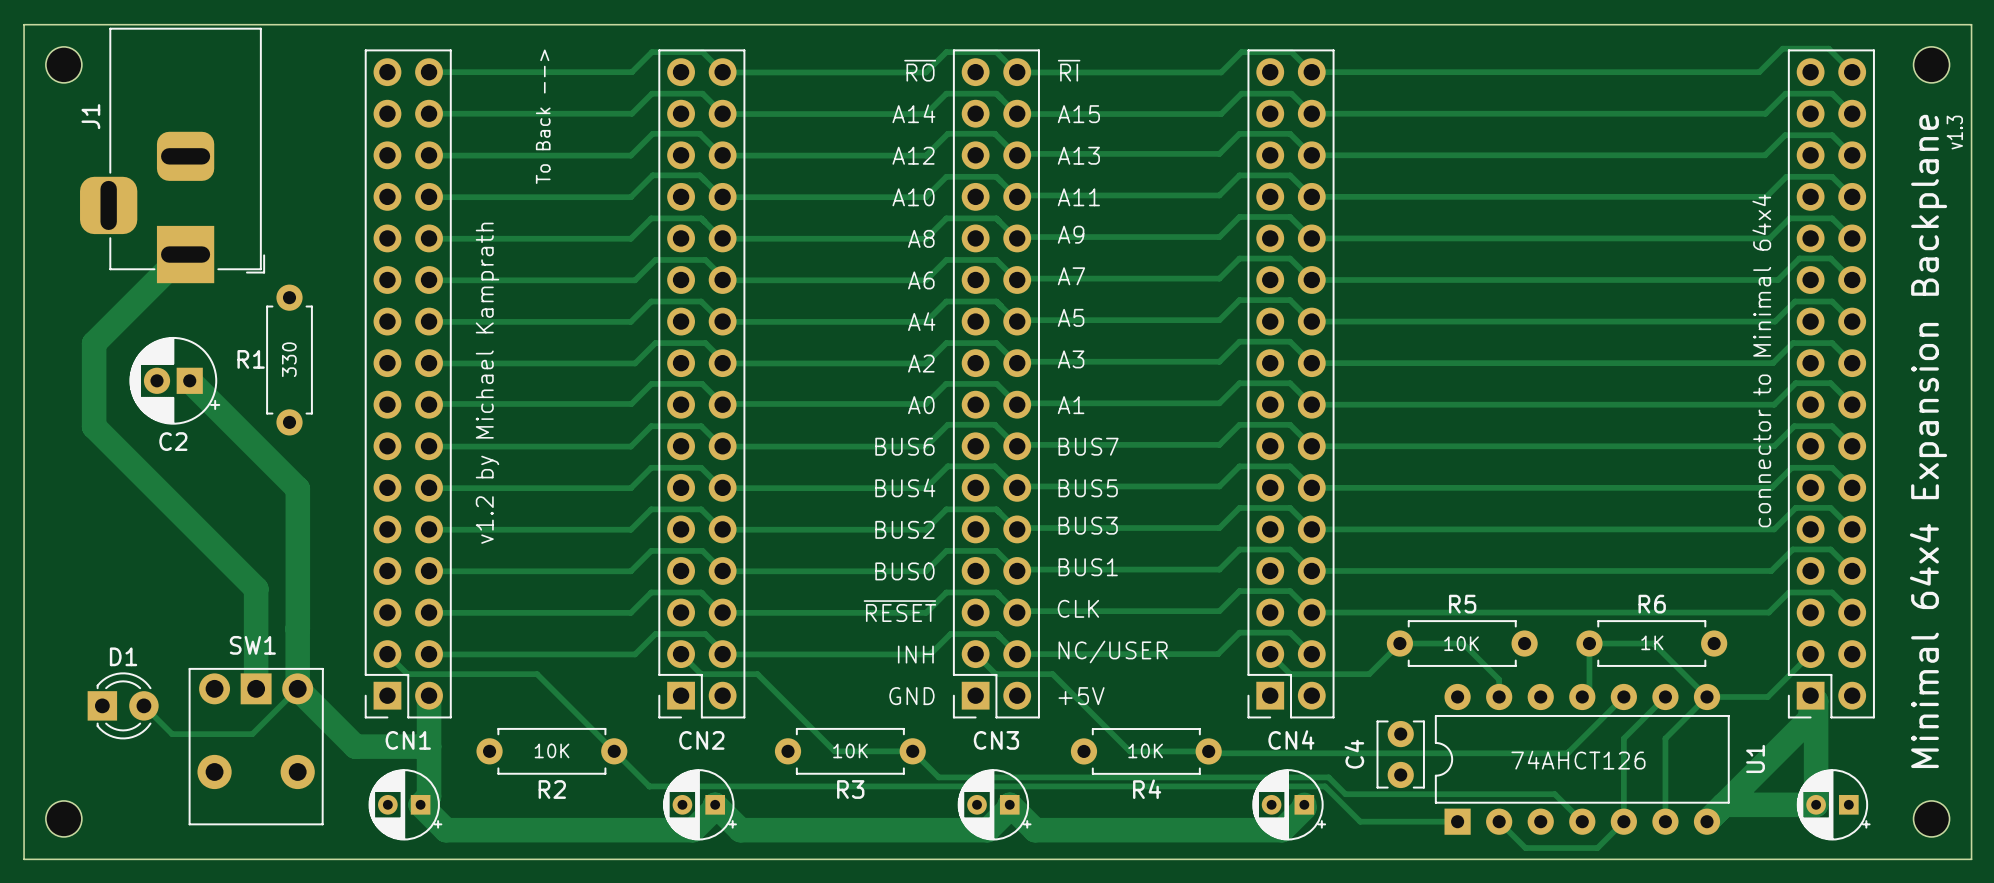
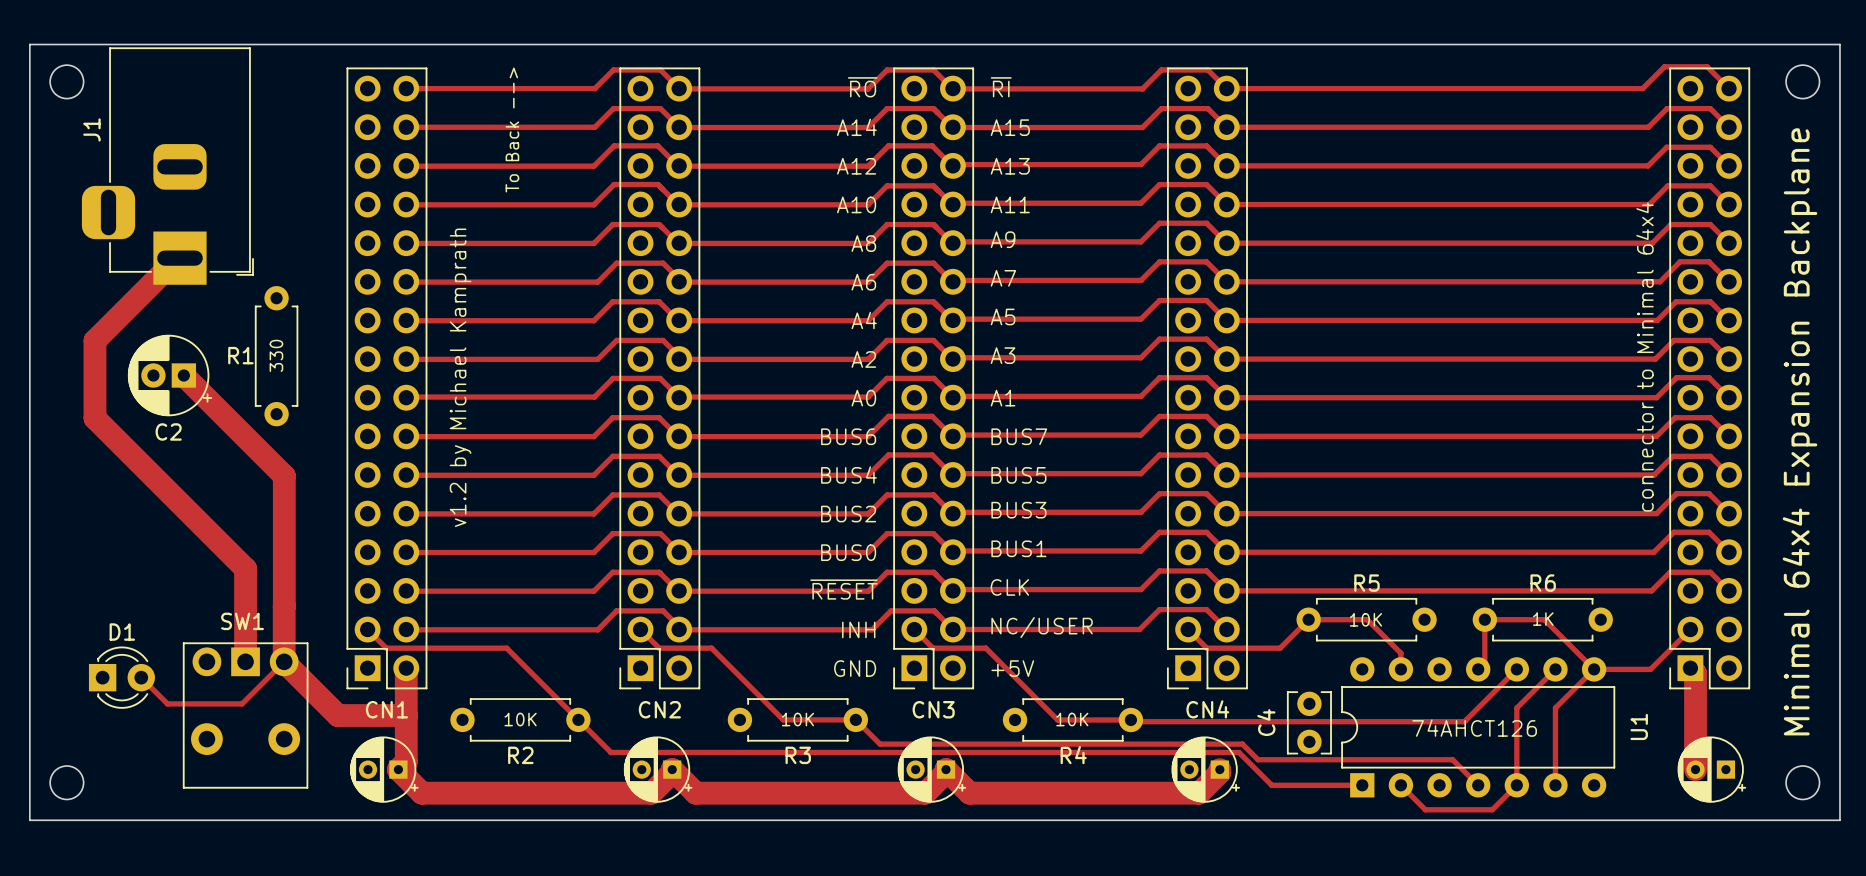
text: v1.3 (1954, 132) -> none
track: (1810, 695) (1810, 718) (1707, 821) -> none
track: (1723, 804) (1816, 804) -> none

